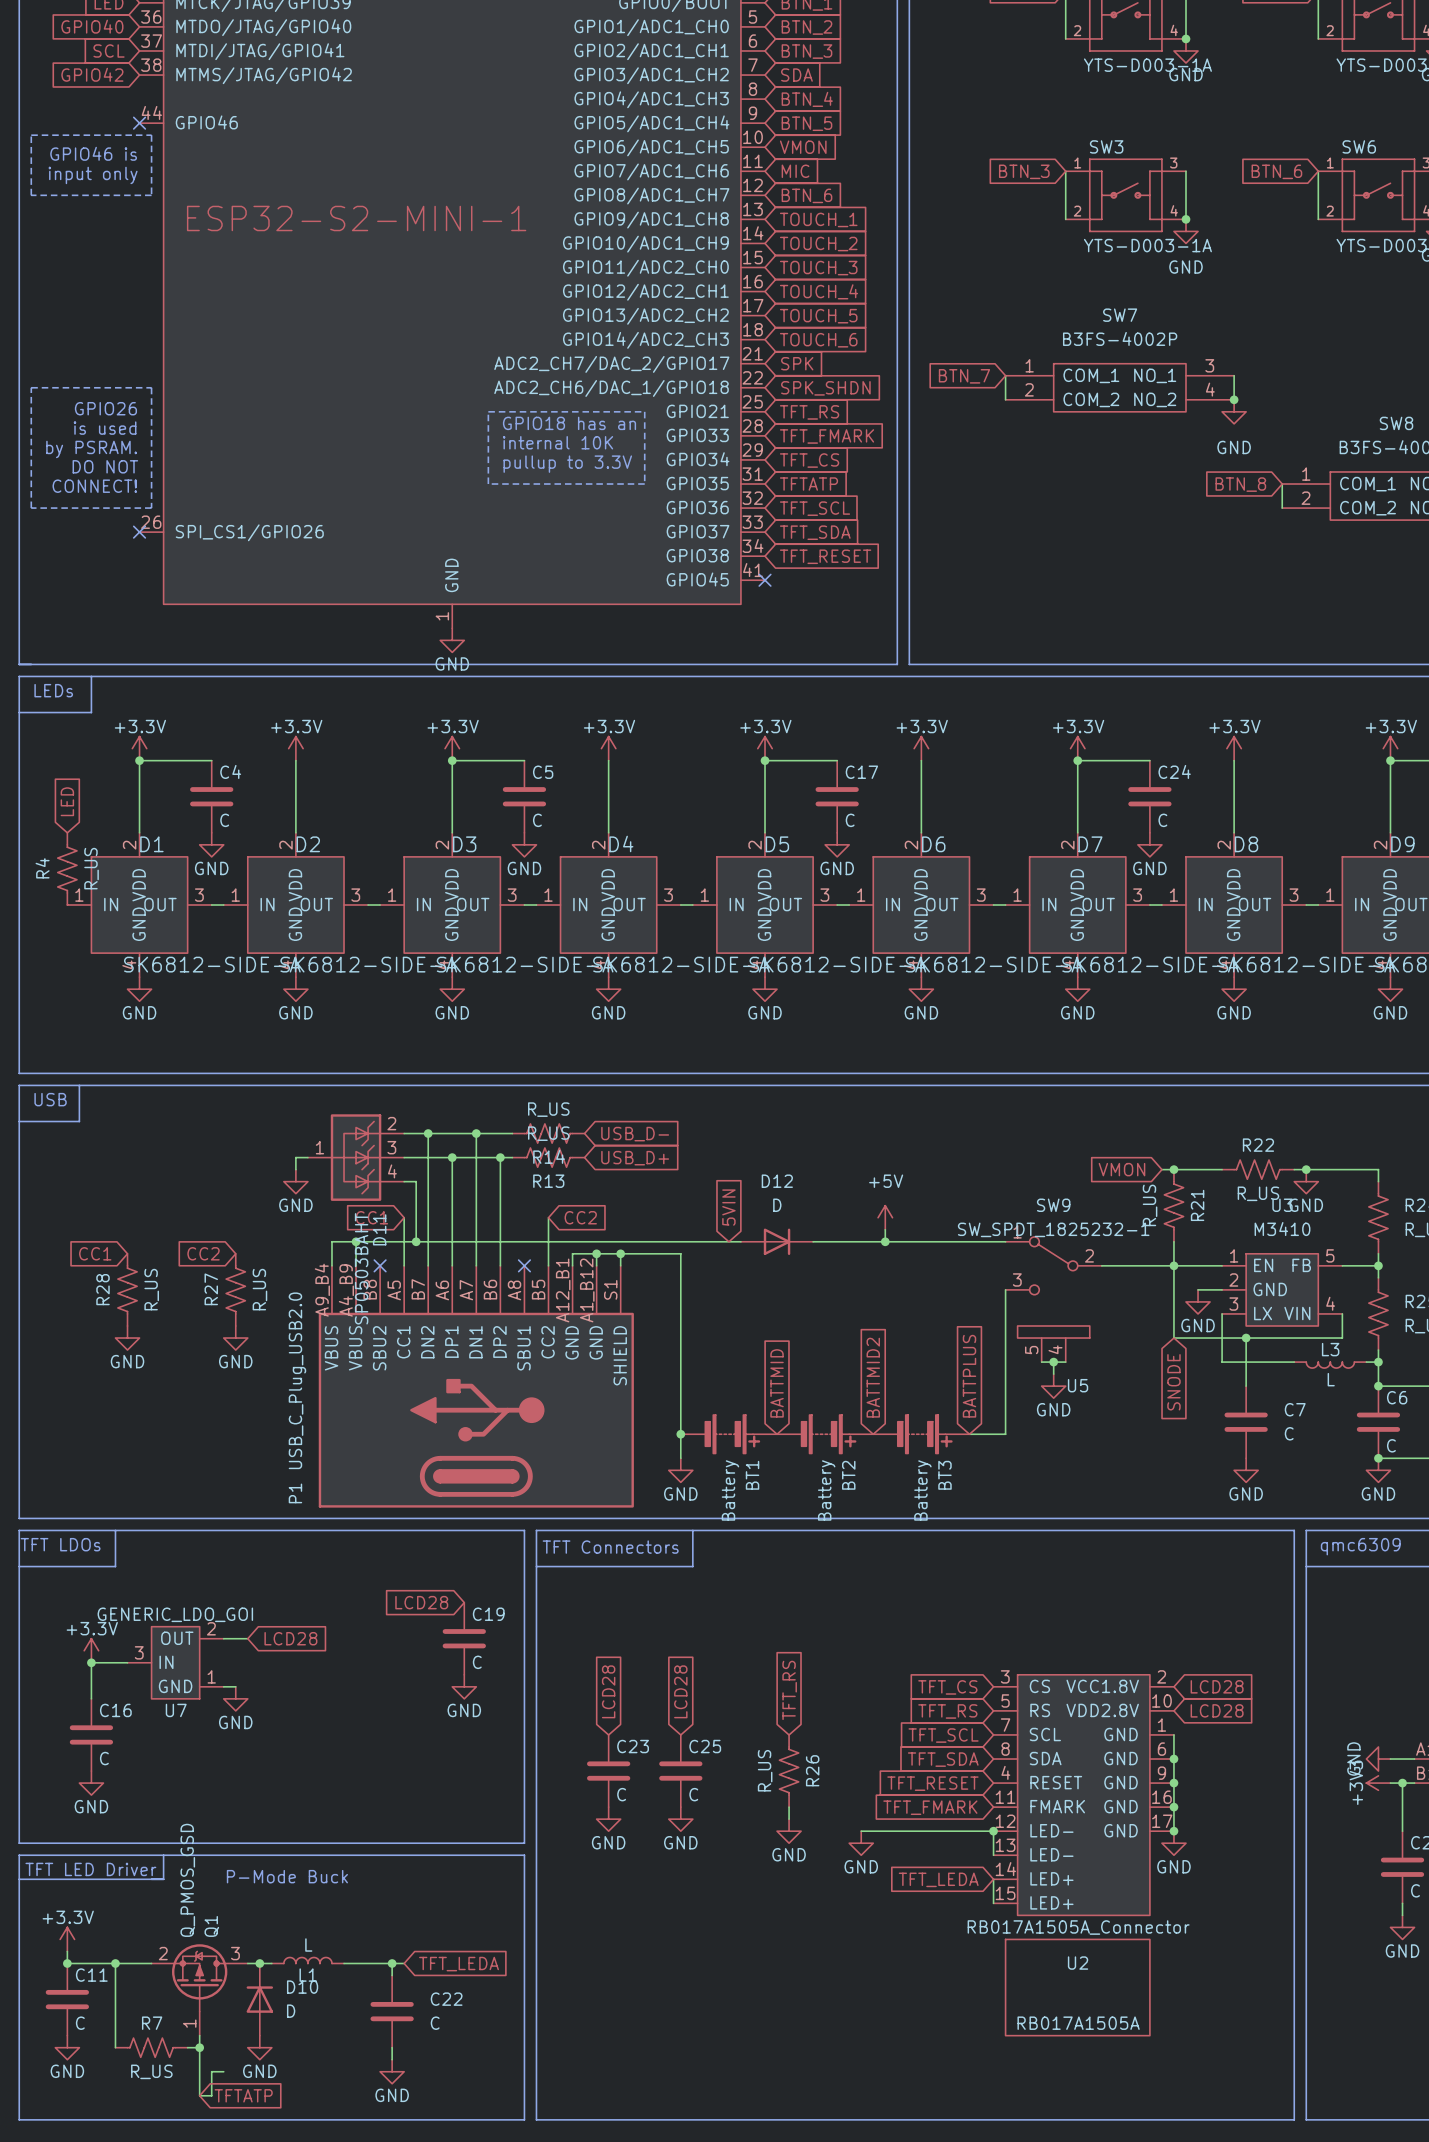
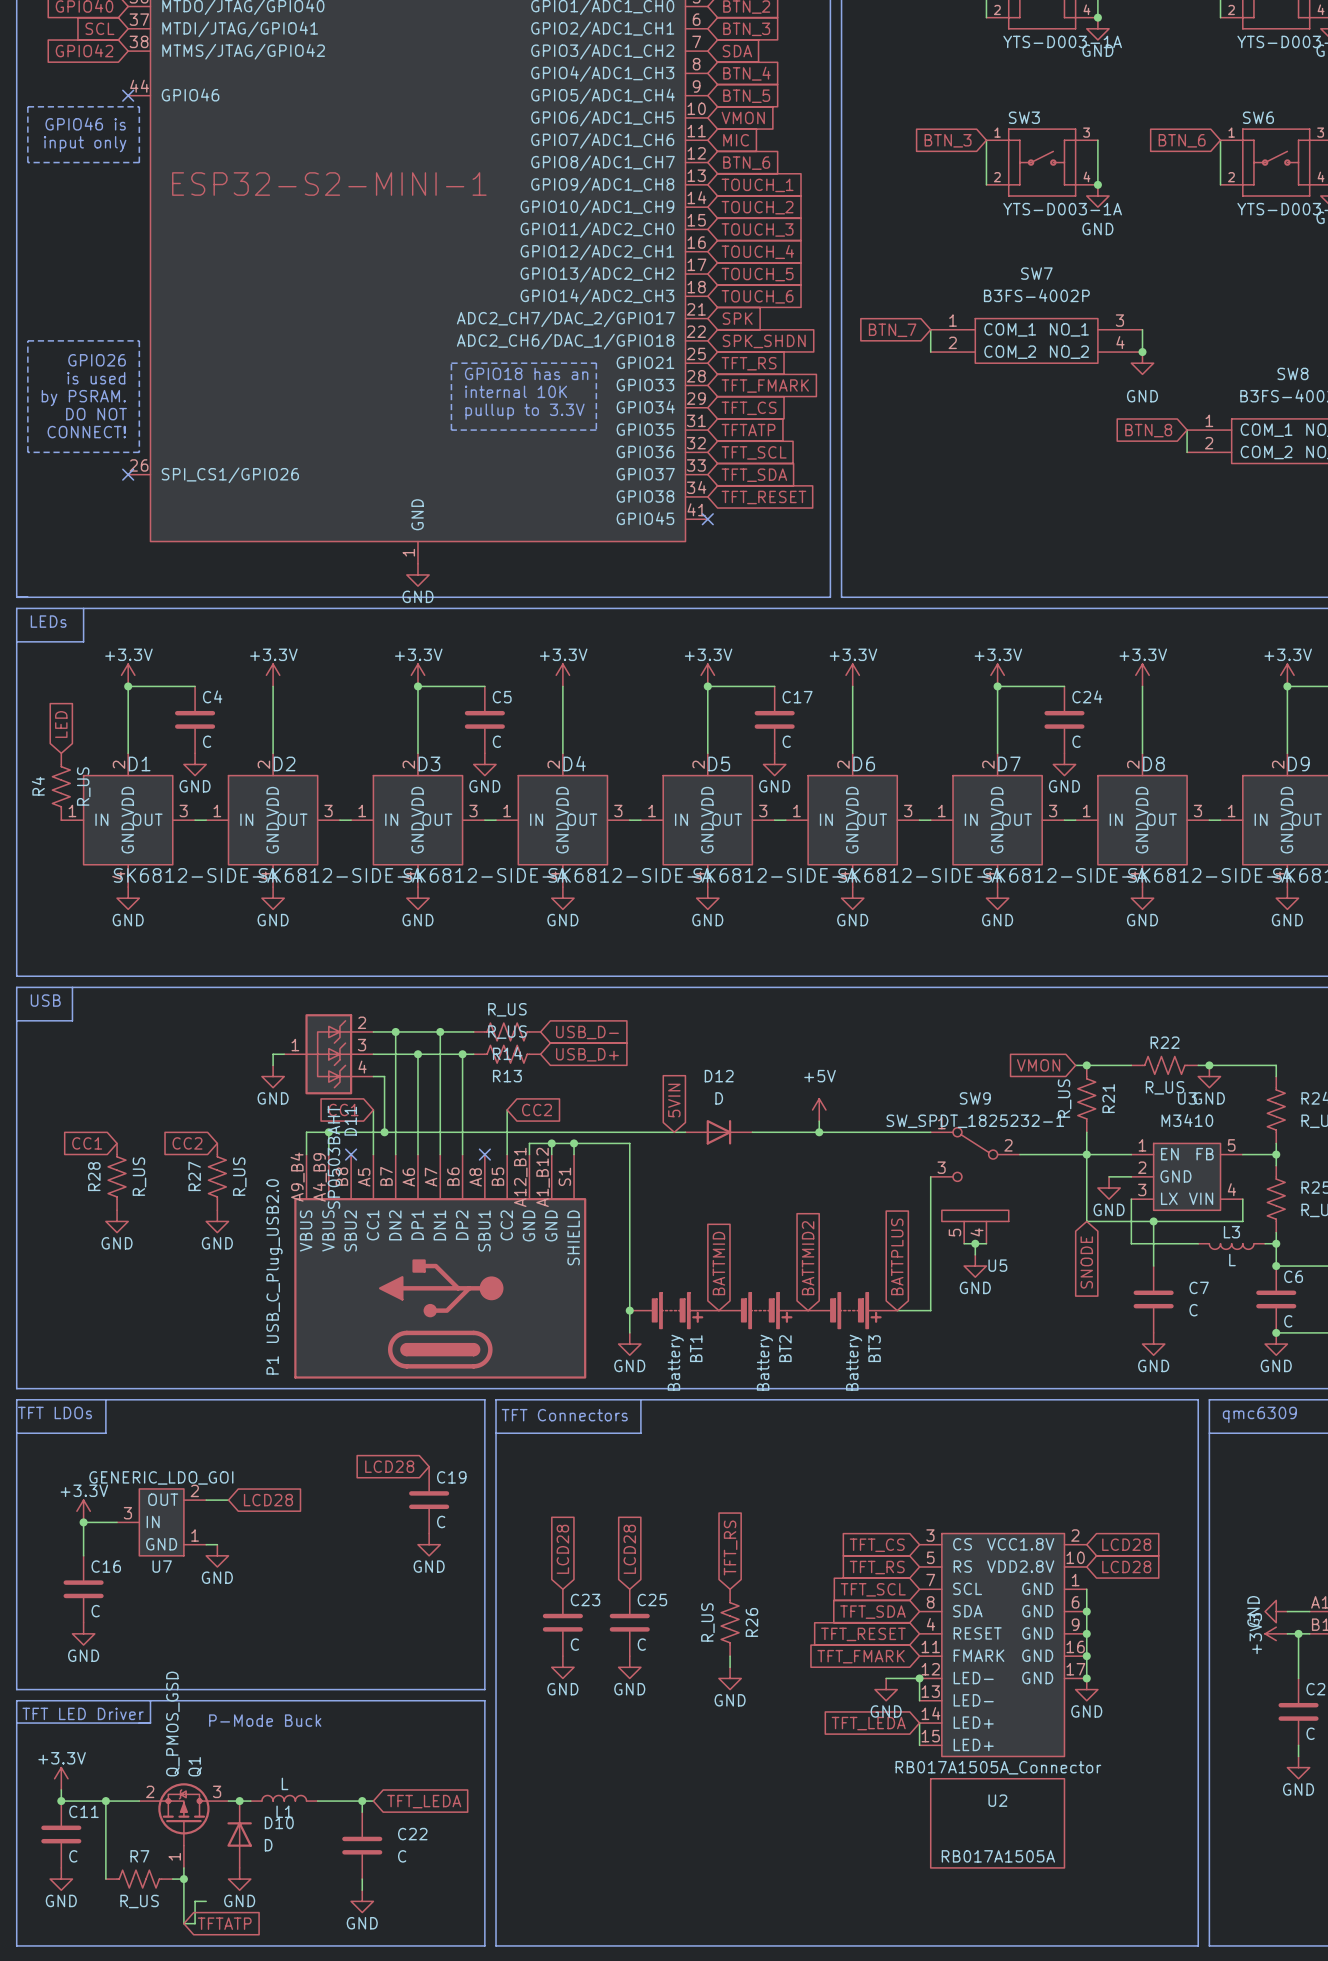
wire: (861, 1831) (957, 1831) -> none
power symbol position: GND (861, 1843) -> GND (886, 1689)

